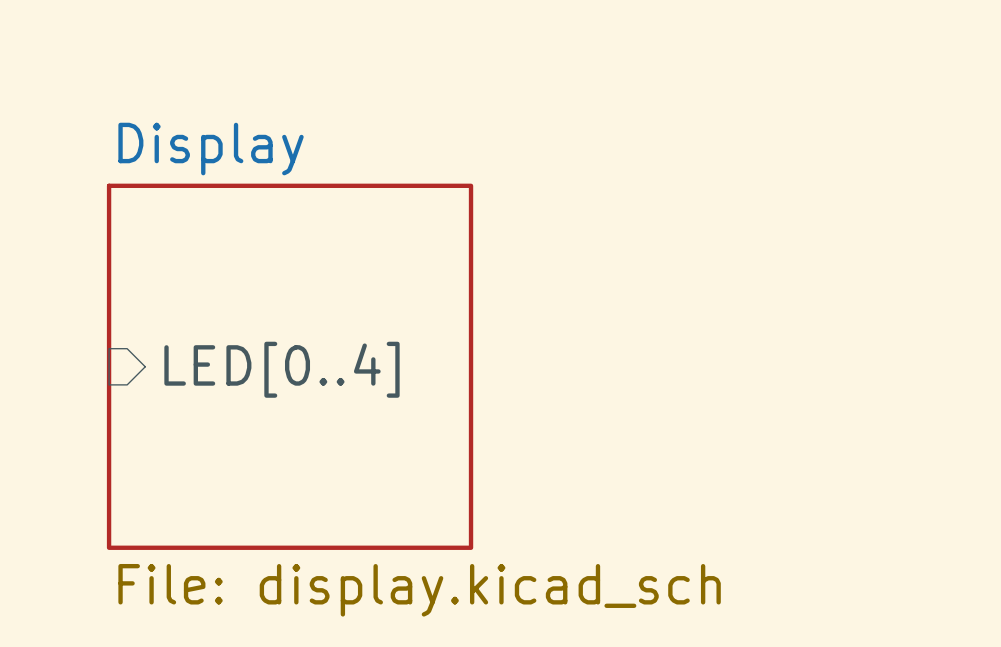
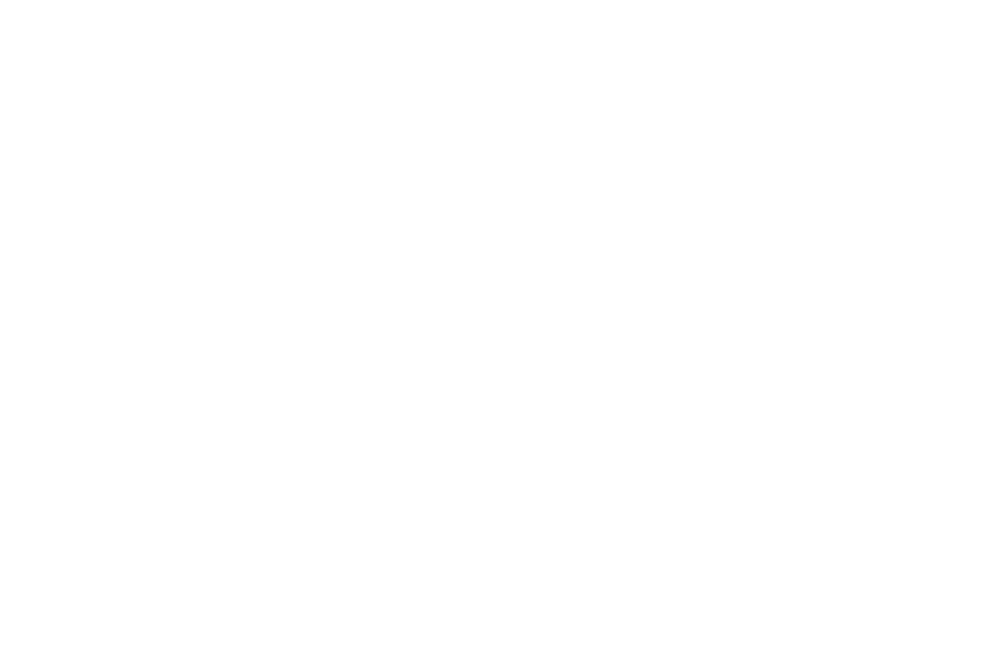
sheet Display: File: display.kicad_sch (290, 366) -> none
sheet pin: LED[0..4] (281, 369) -> none

